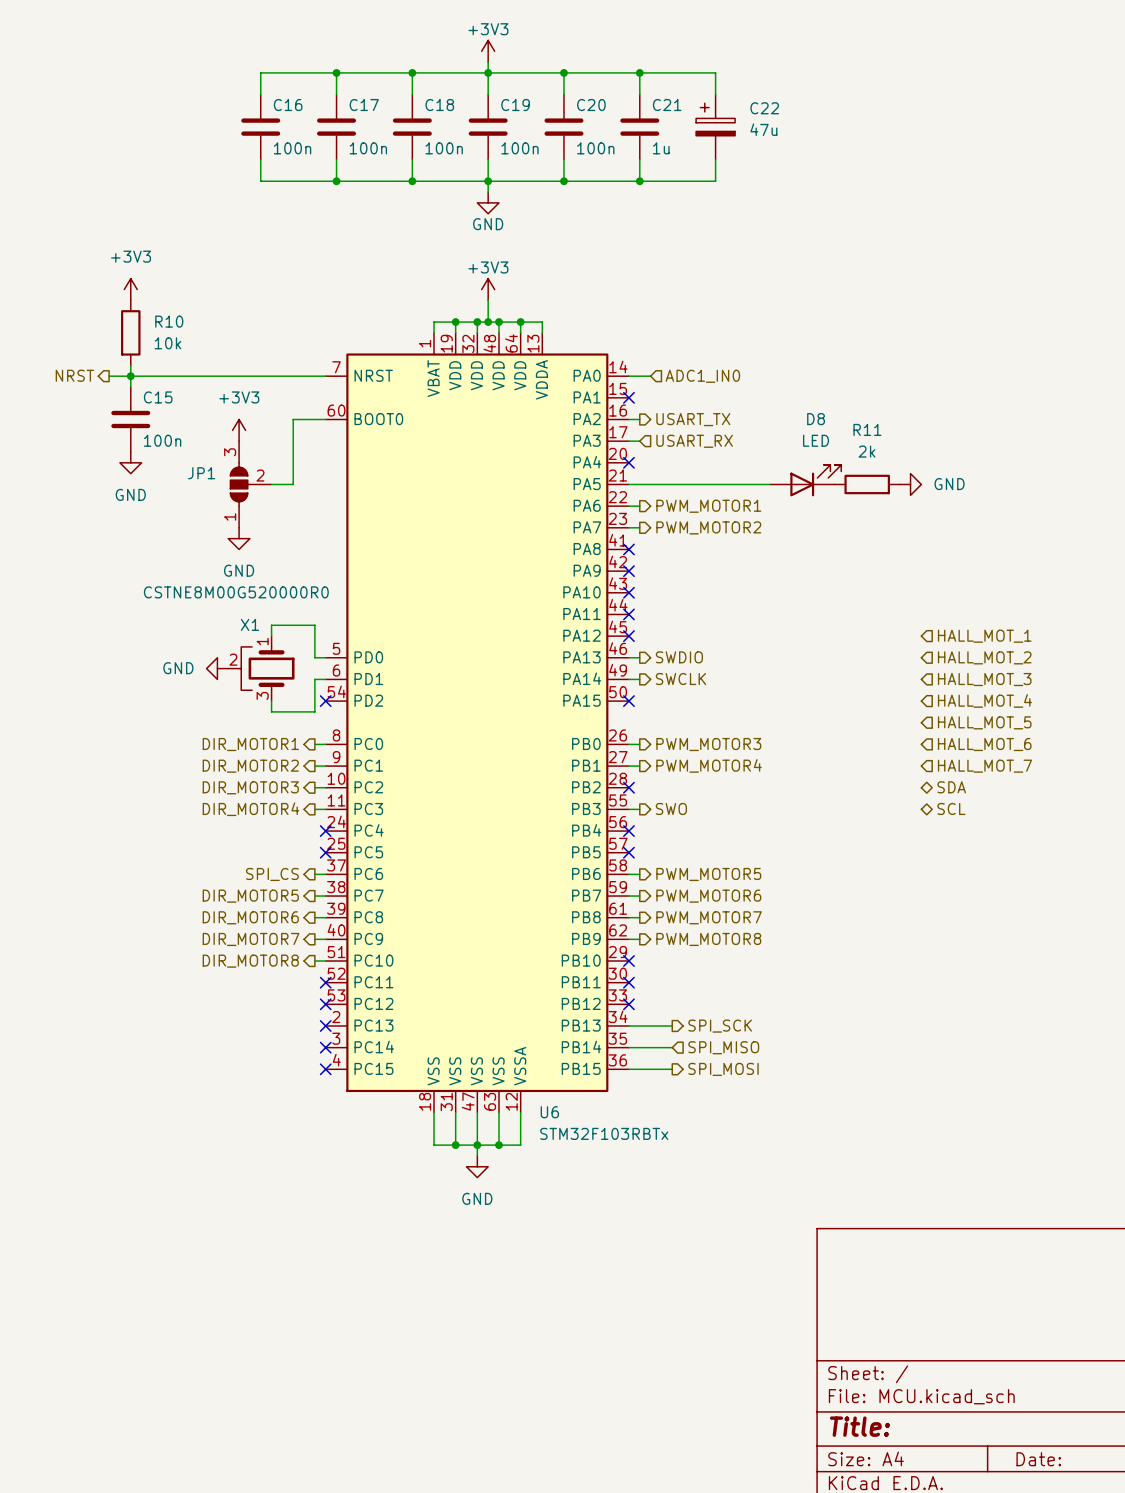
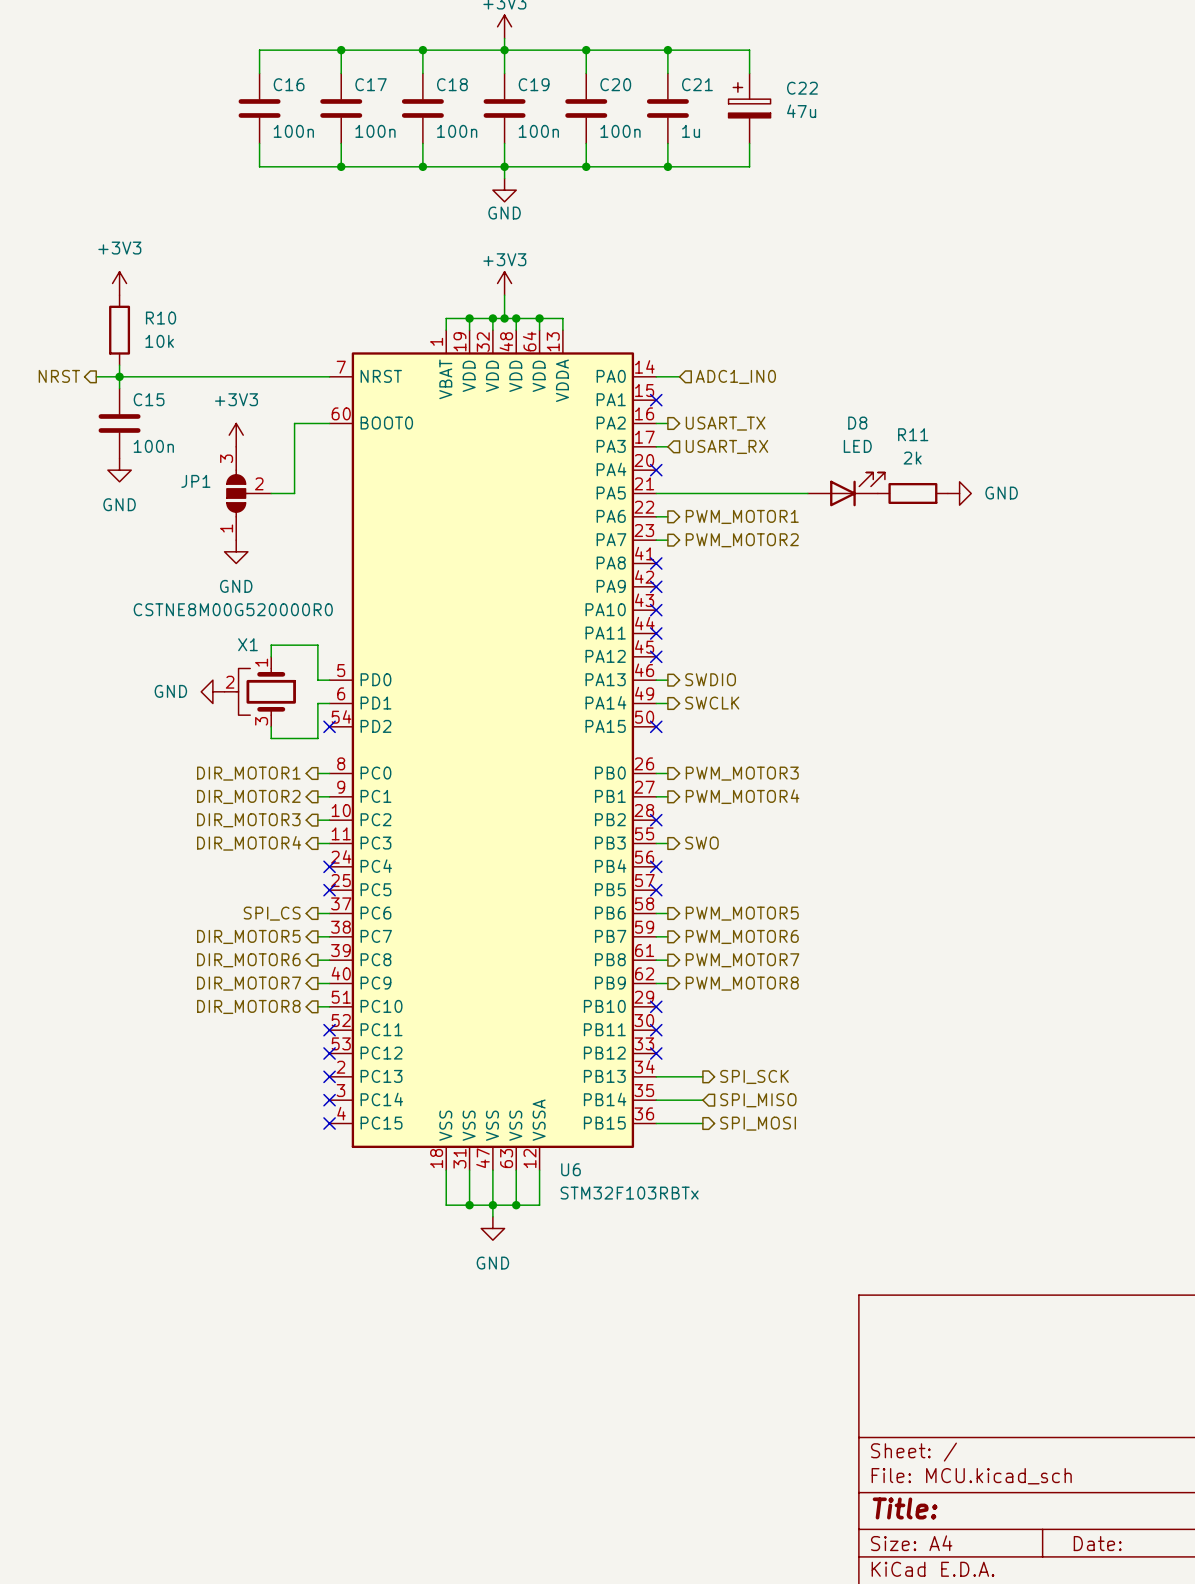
hierarchical label: HALL_MOT_1 (984, 636) -> none
hierarchical label: HALL_MOT_2 (984, 657) -> none
hierarchical label: HALL_MOT_3 (984, 679) -> none
hierarchical label: HALL_MOT_4 (984, 700) -> none
hierarchical label: HALL_MOT_5 (984, 722) -> none
hierarchical label: HALL_MOT_6 (984, 744) -> none
hierarchical label: HALL_MOT_7 (984, 766) -> none
hierarchical label: SDA (951, 787) -> none
hierarchical label: SCL (951, 808) -> none

